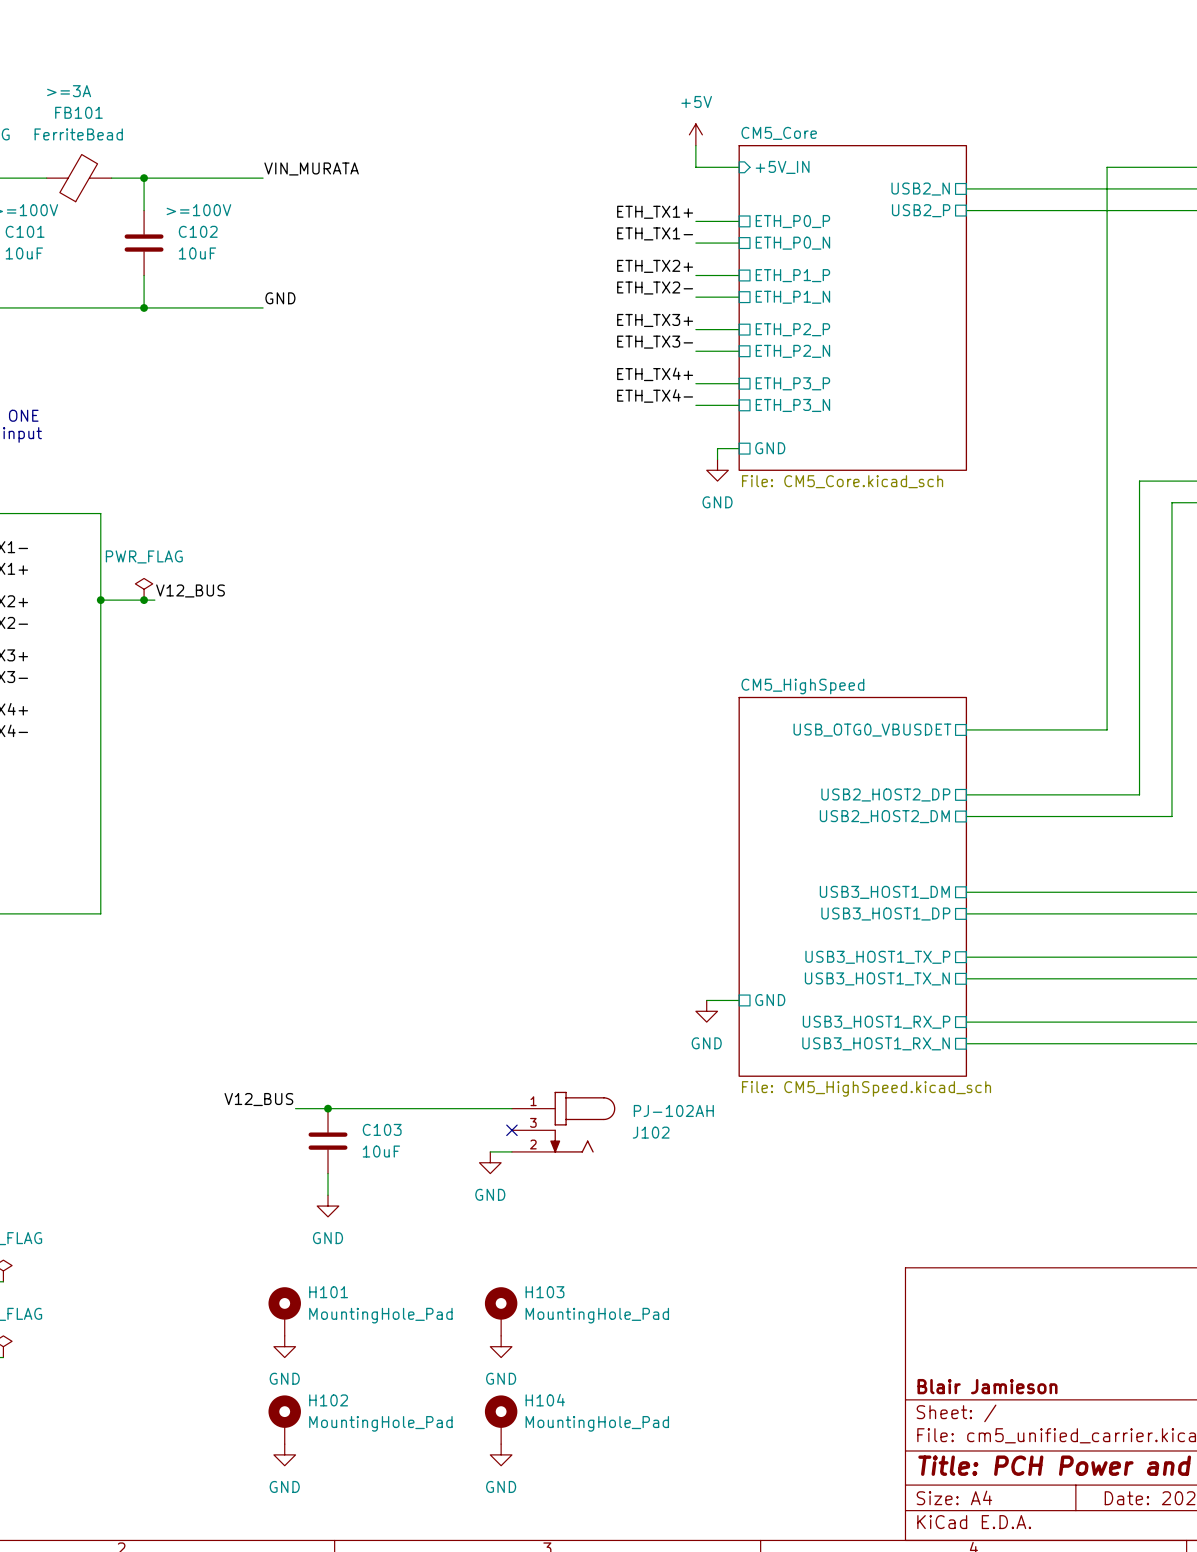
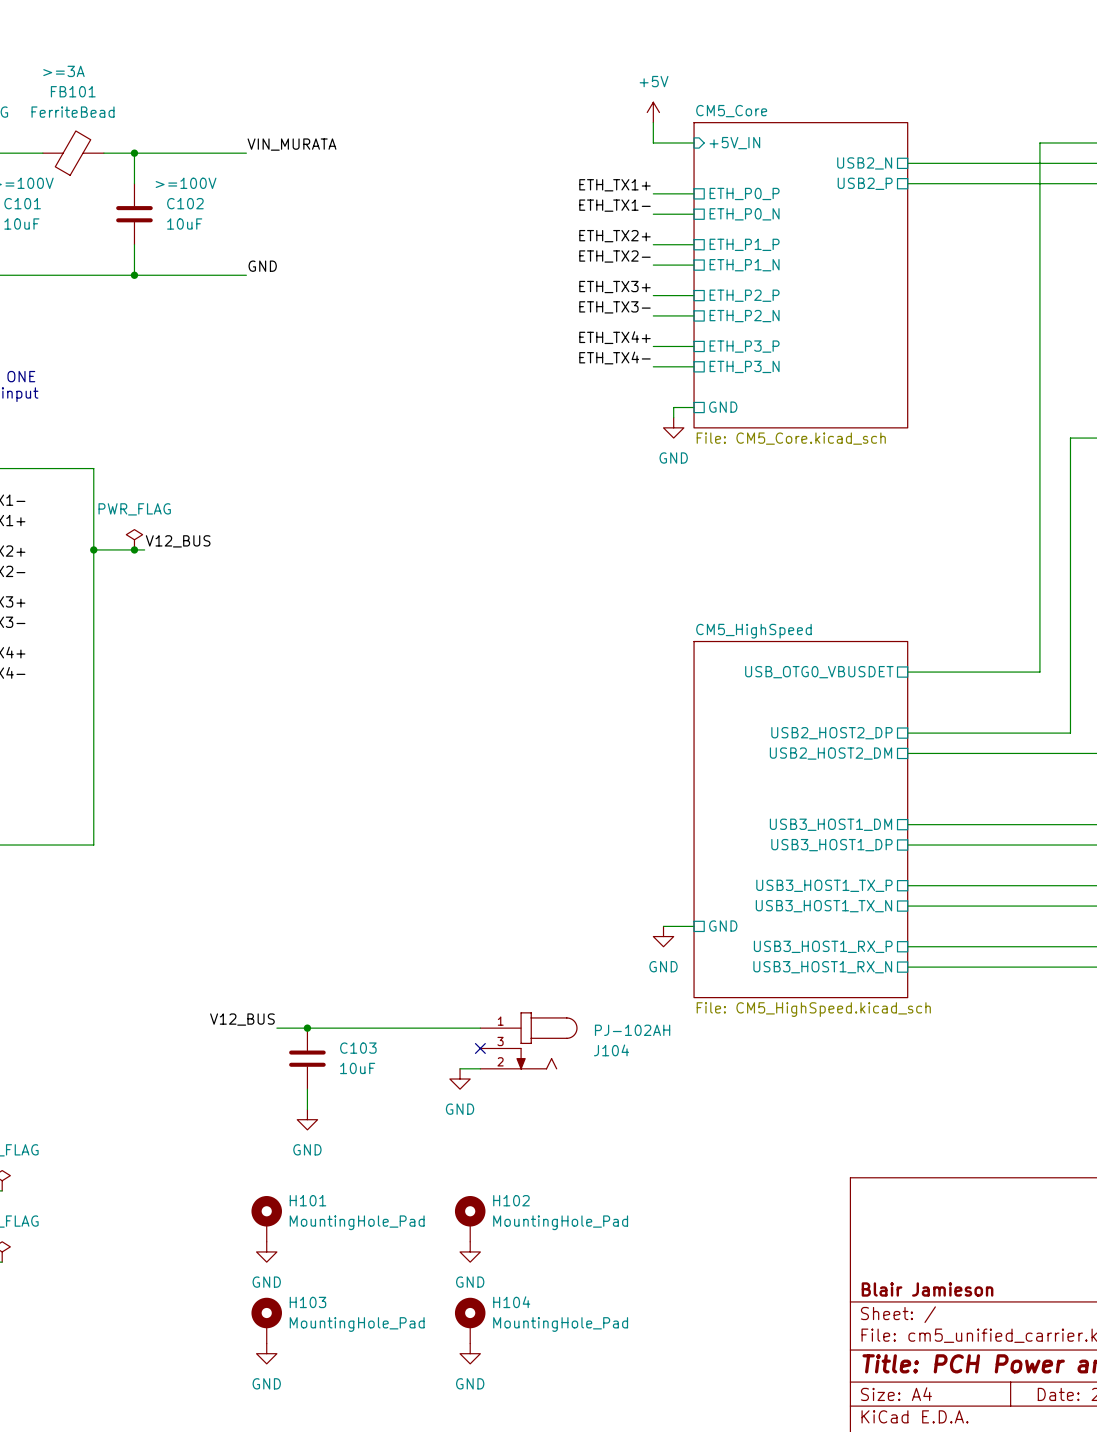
J102 name: J102 (651, 1132) -> J104 (611, 1050)
H103 name: H103 (545, 1292) -> H102 (511, 1200)
H102 name: H102 (328, 1400) -> H103 (307, 1302)

